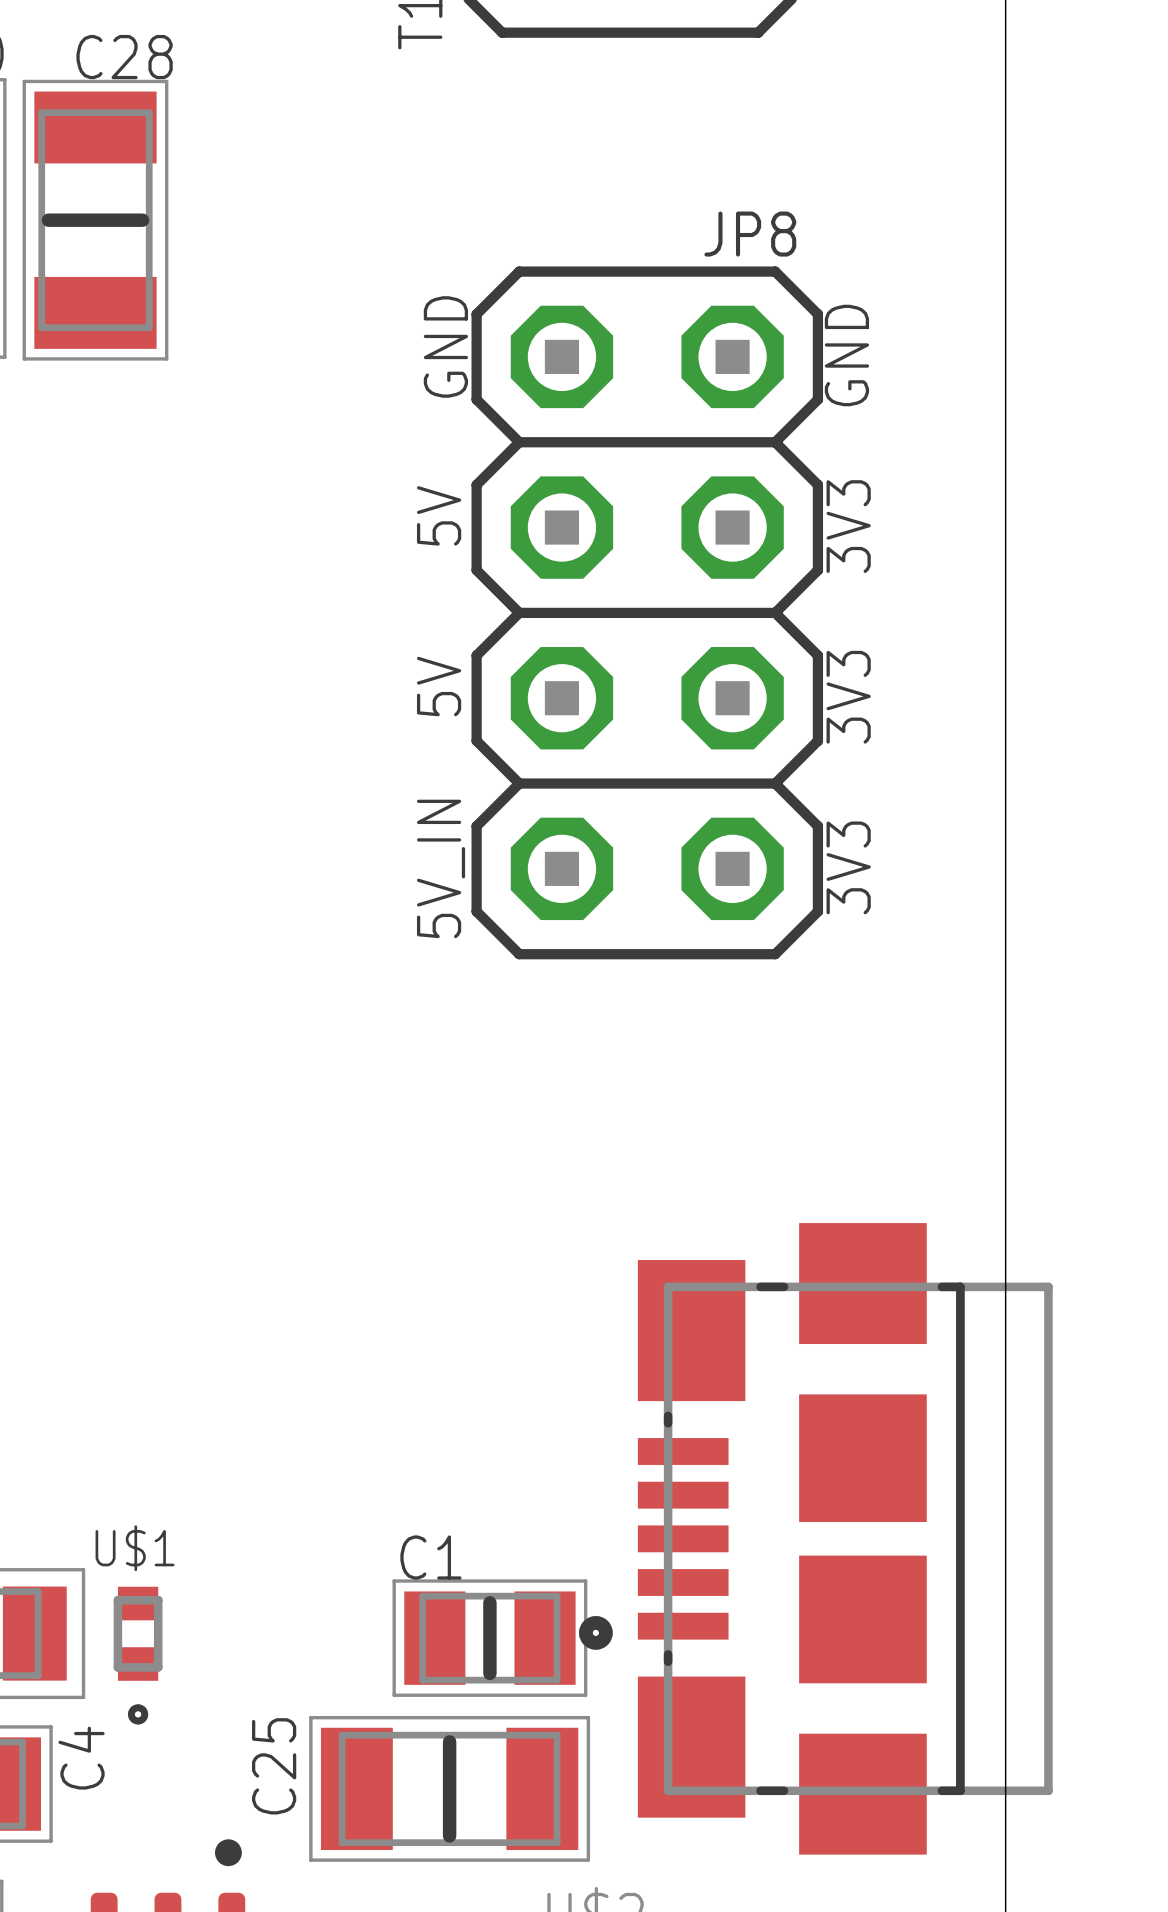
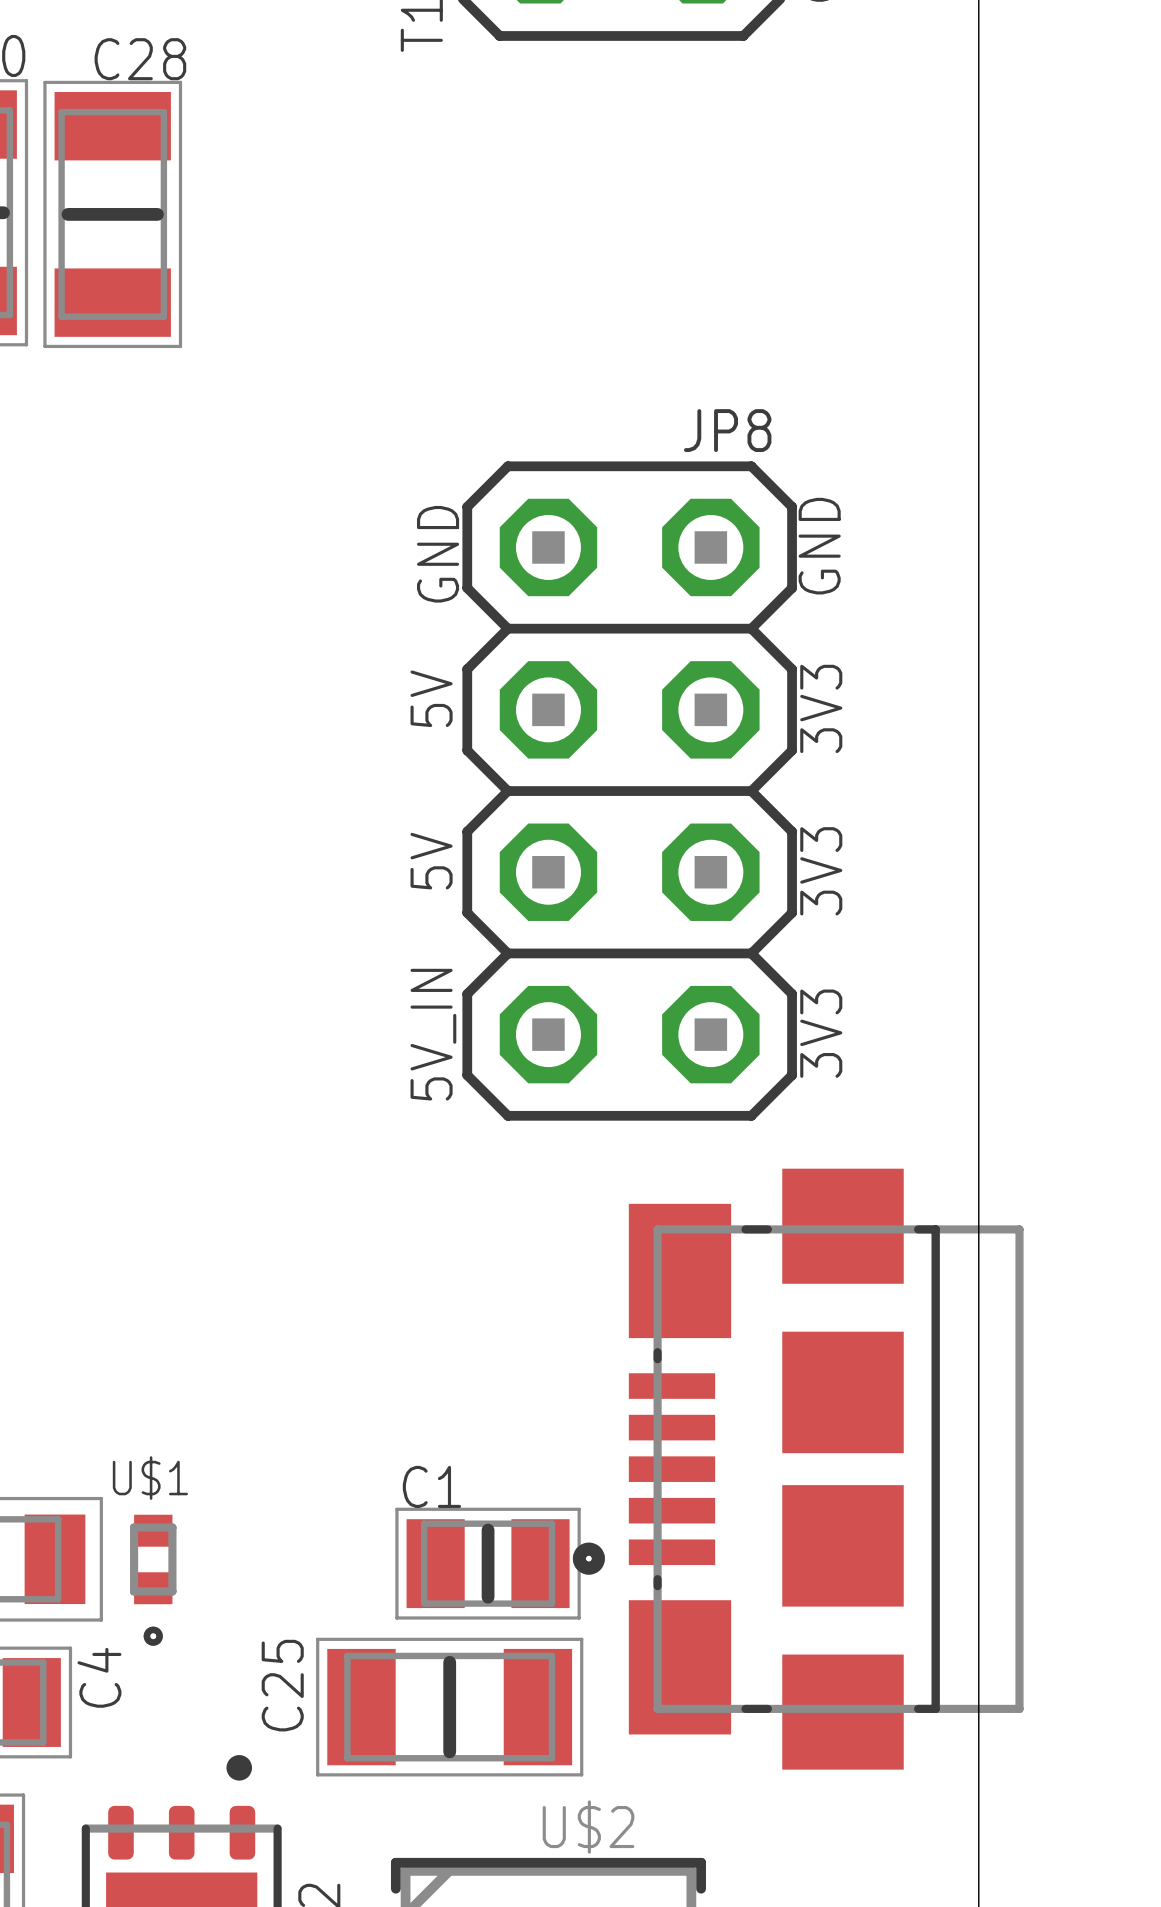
text: GND (445, 346) -> none
text position: GND (846, 355) -> GND (819, 546)
text position: 5V (439, 515) -> 5V (431, 861)
text position: 3V3 (848, 526) -> 3V3 (821, 1033)
text: none -> GND (438, 554)
JP8 position: (647, 612) -> (629, 791)
text position: 5V (439, 686) -> 5V (431, 698)
text position: 3V3 (848, 697) -> 3V3 (821, 708)
text position: 3V3 (848, 867) -> 3V3 (821, 871)
text position: 5V_IN (441, 868) -> 5V_IN (433, 1034)

